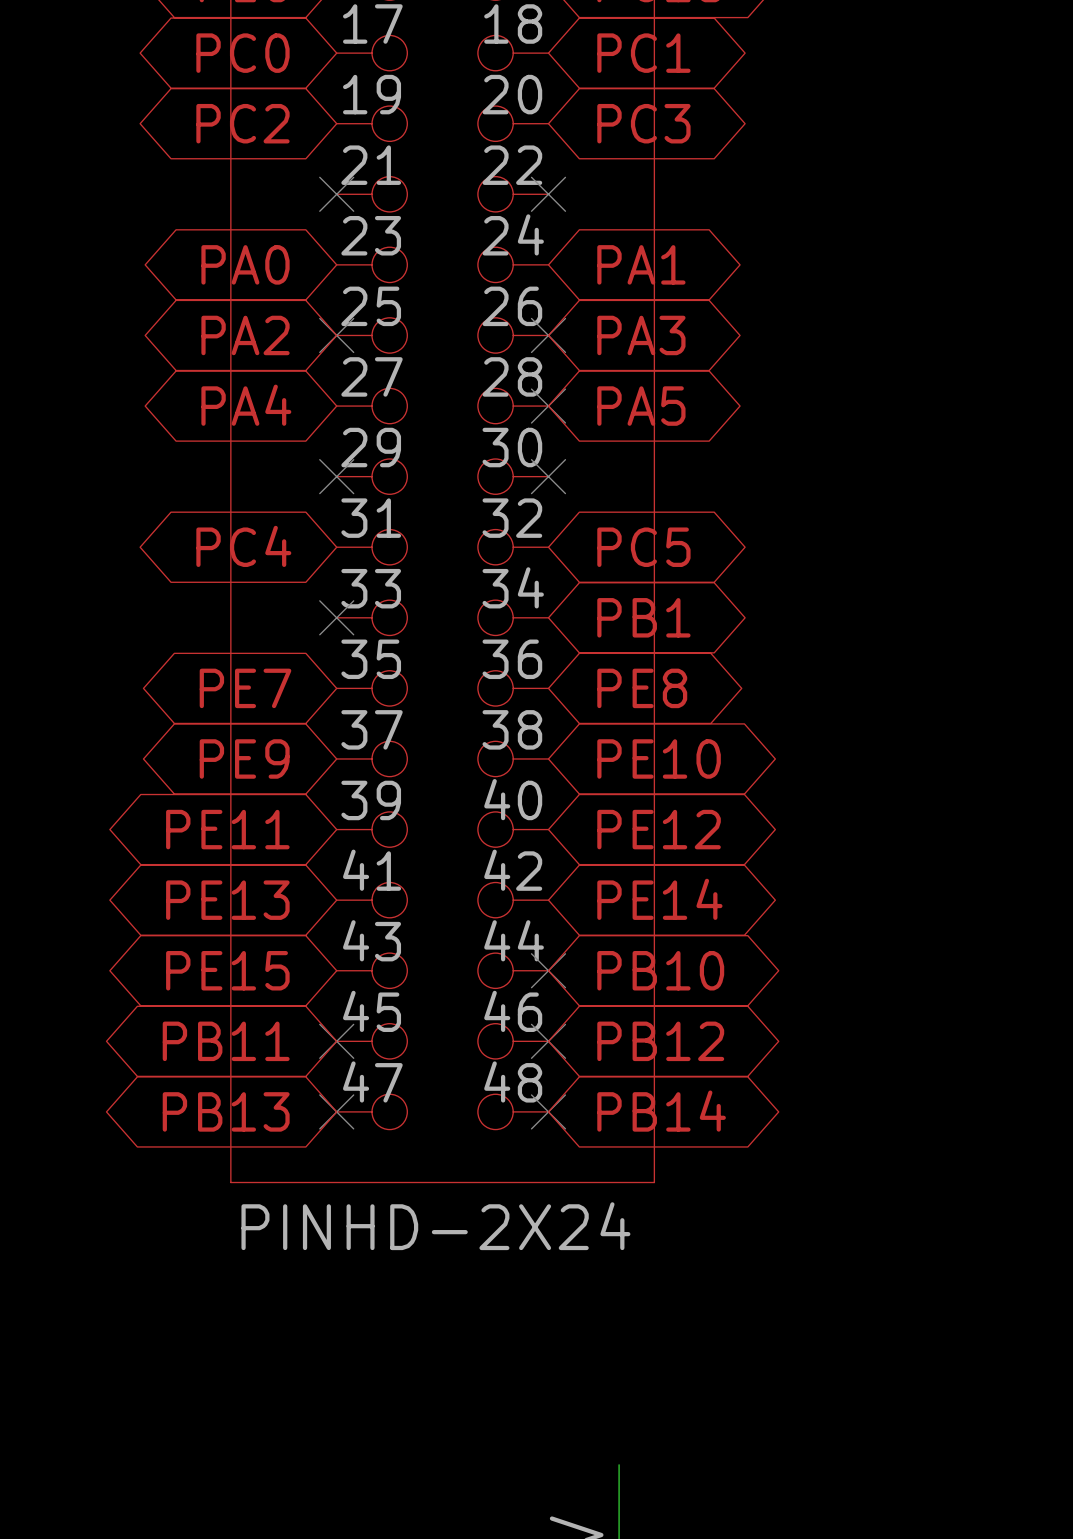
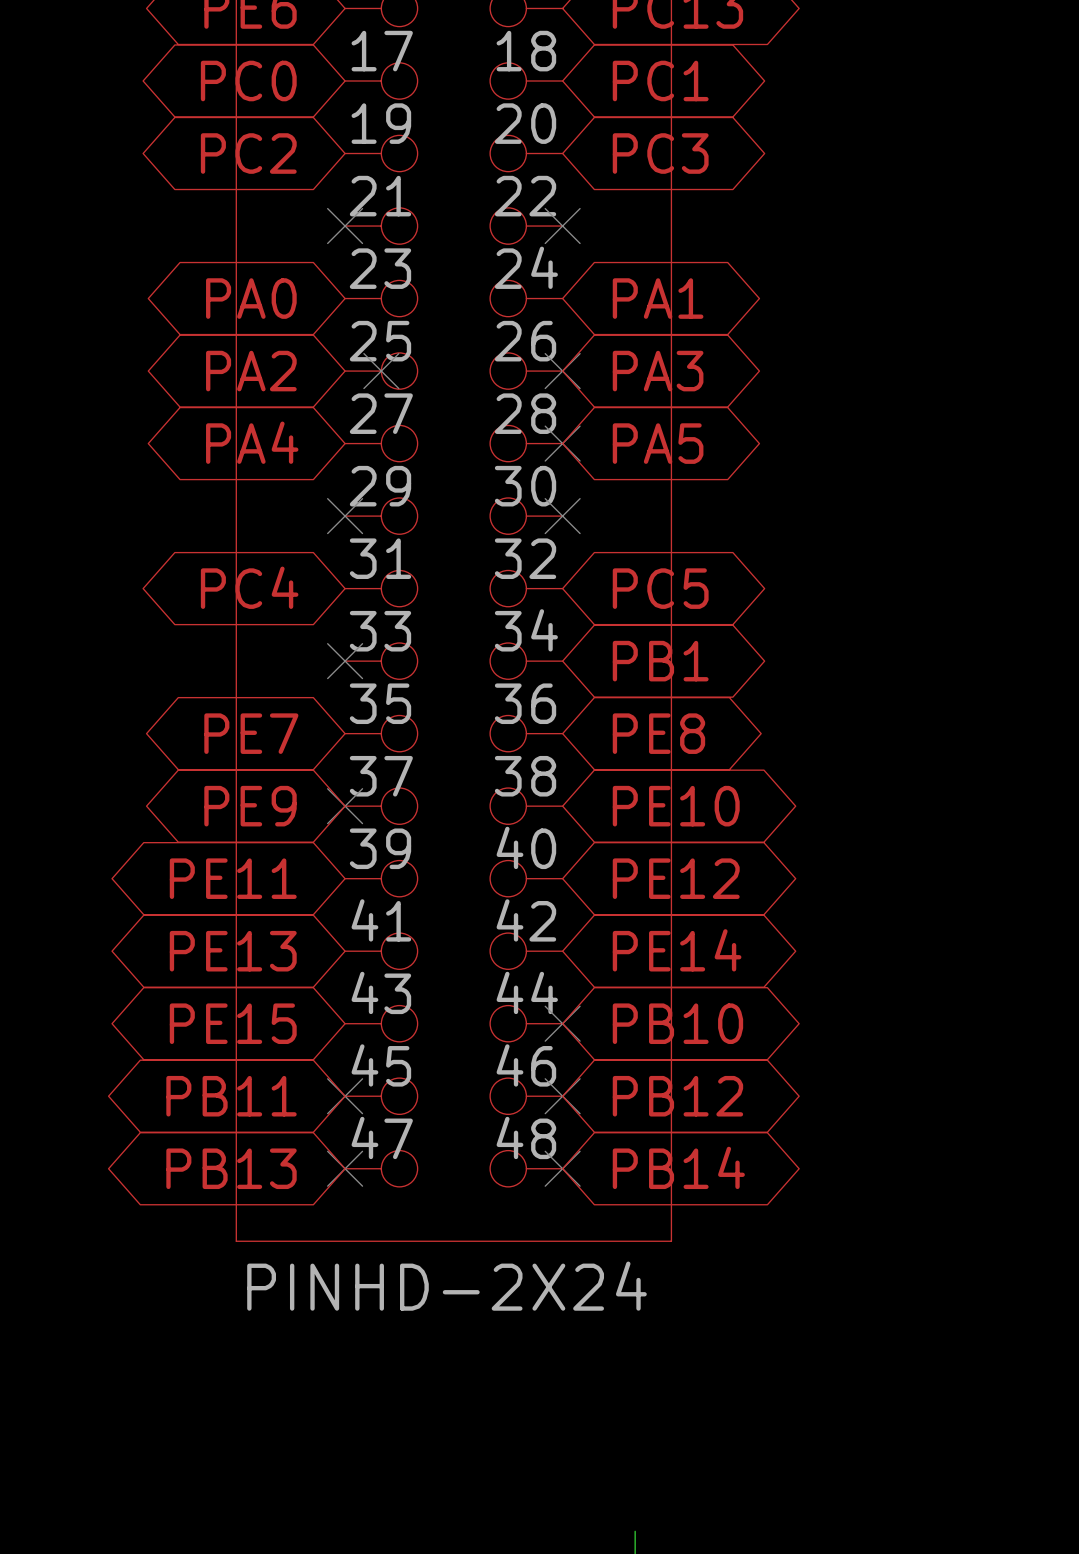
no-connect mark position: (336, 335) -> (381, 371)
no-connect mark: none -> (345, 806)

